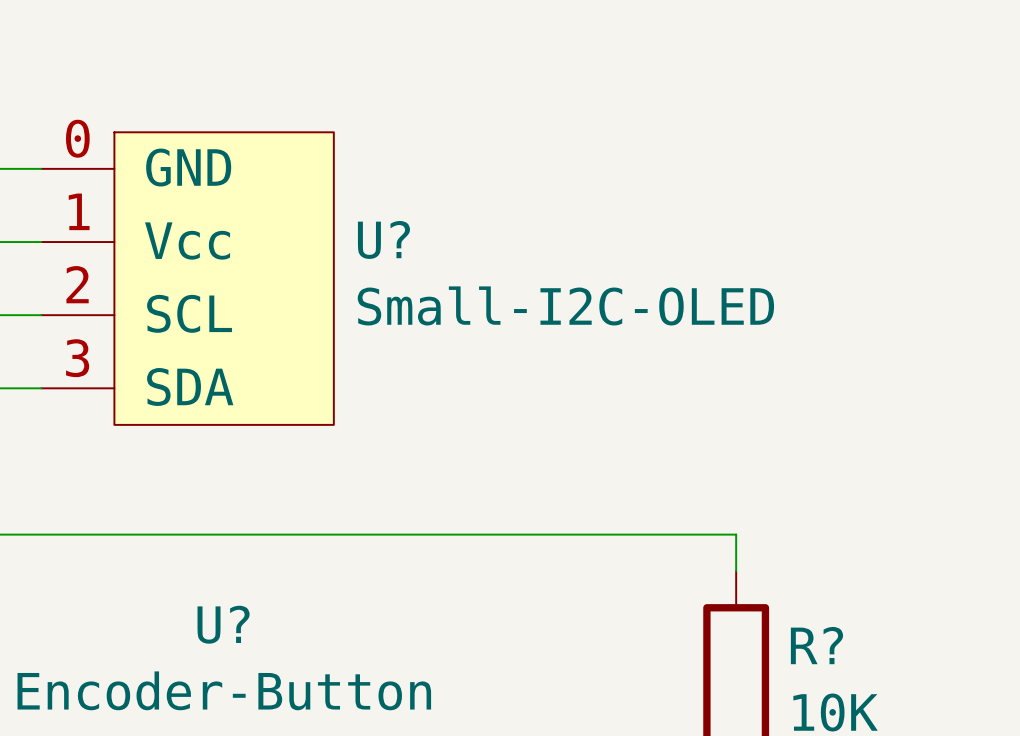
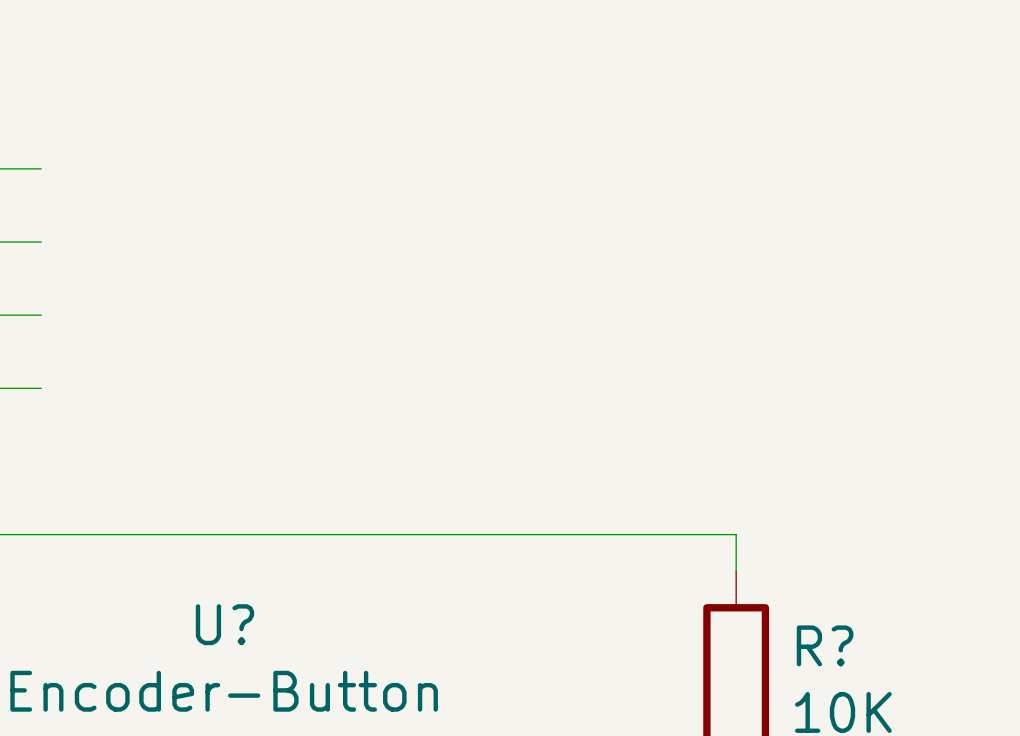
U?: Small-I2C-OLED (187, 278) -> none

